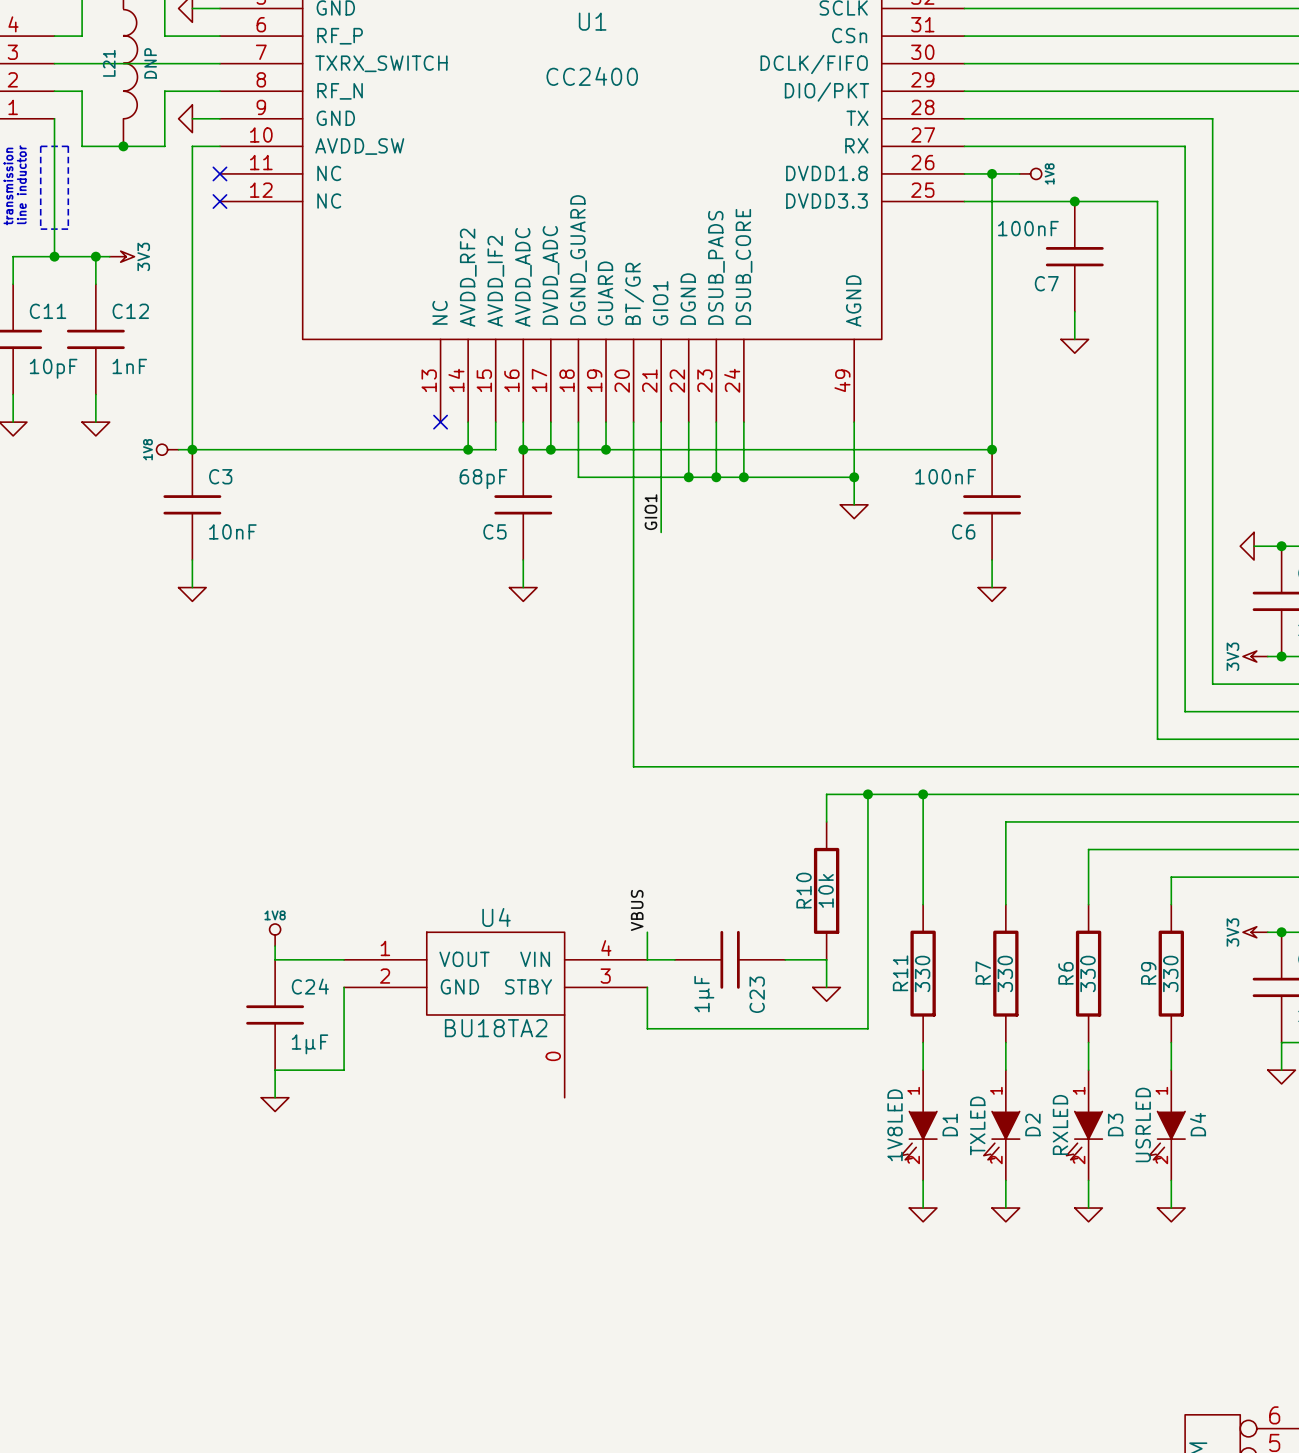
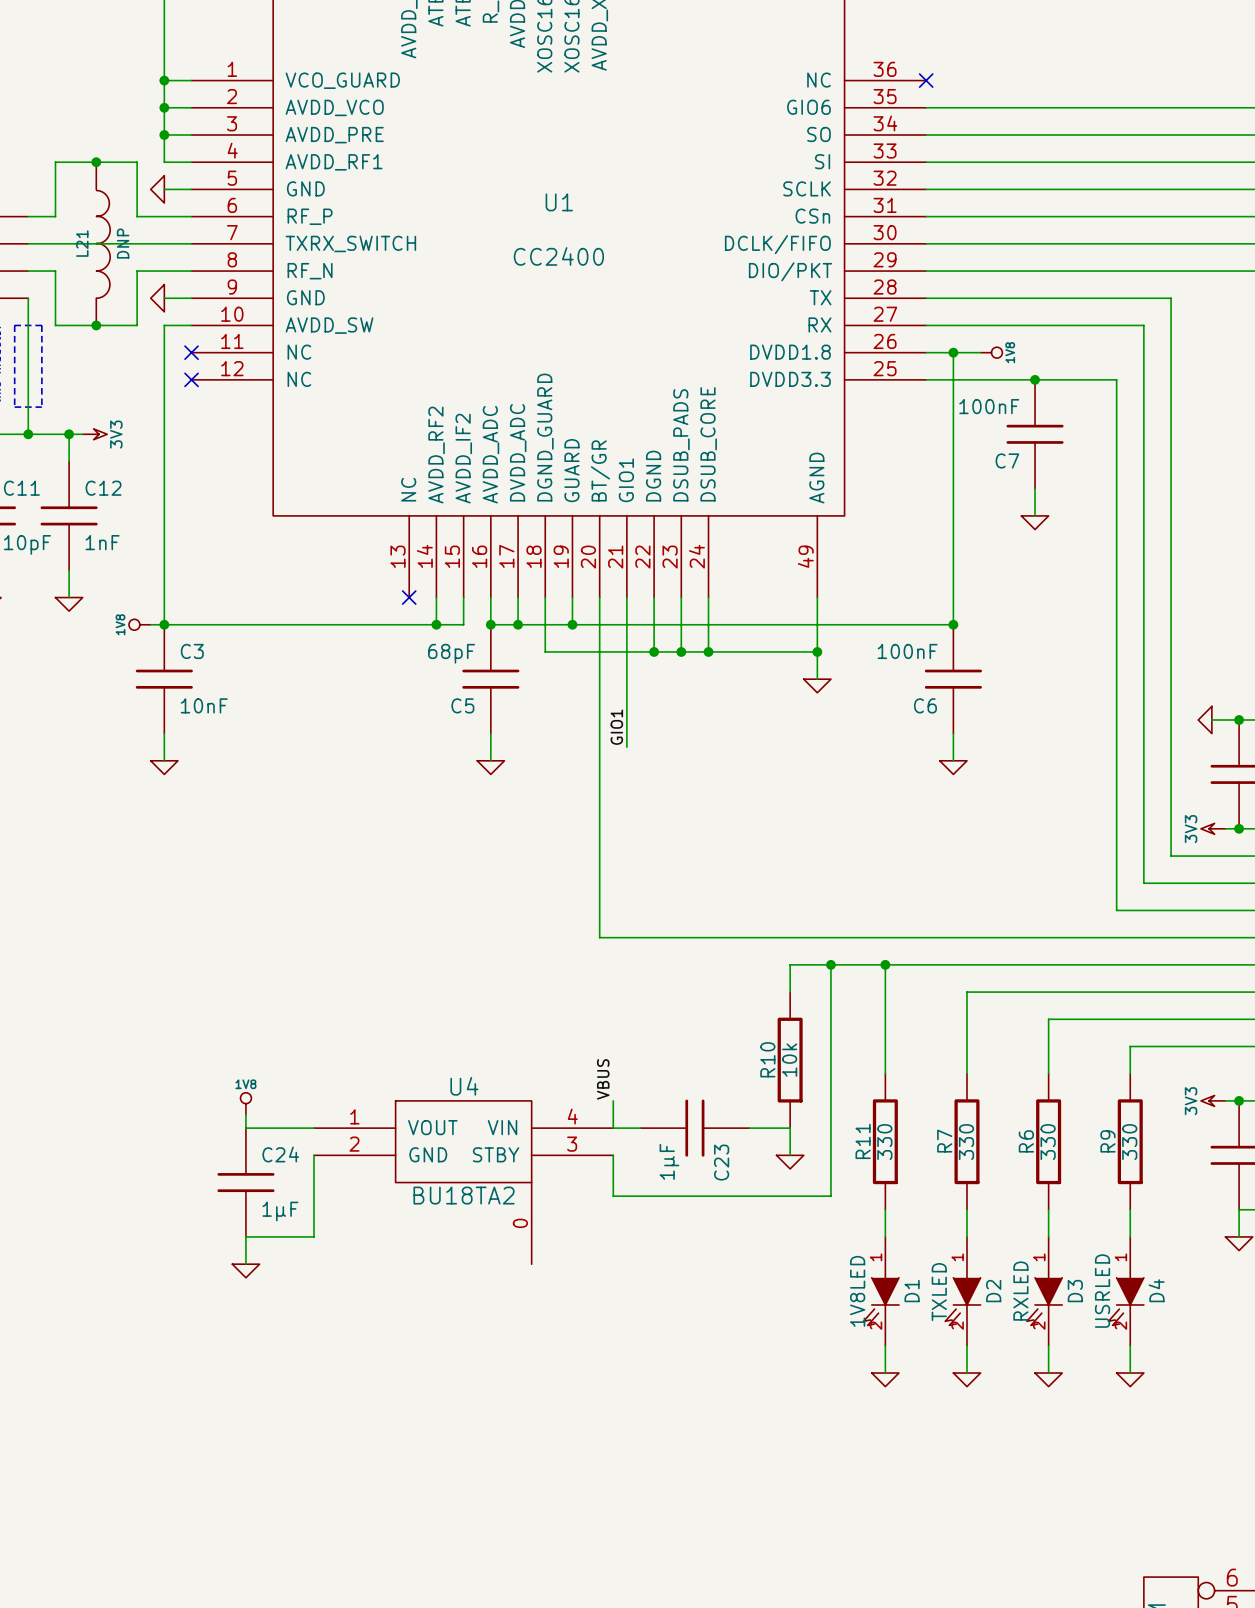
label position: GIO1 (650, 512) -> GIO1 (616, 727)
wire: none -> (626, 706) (626, 747)

